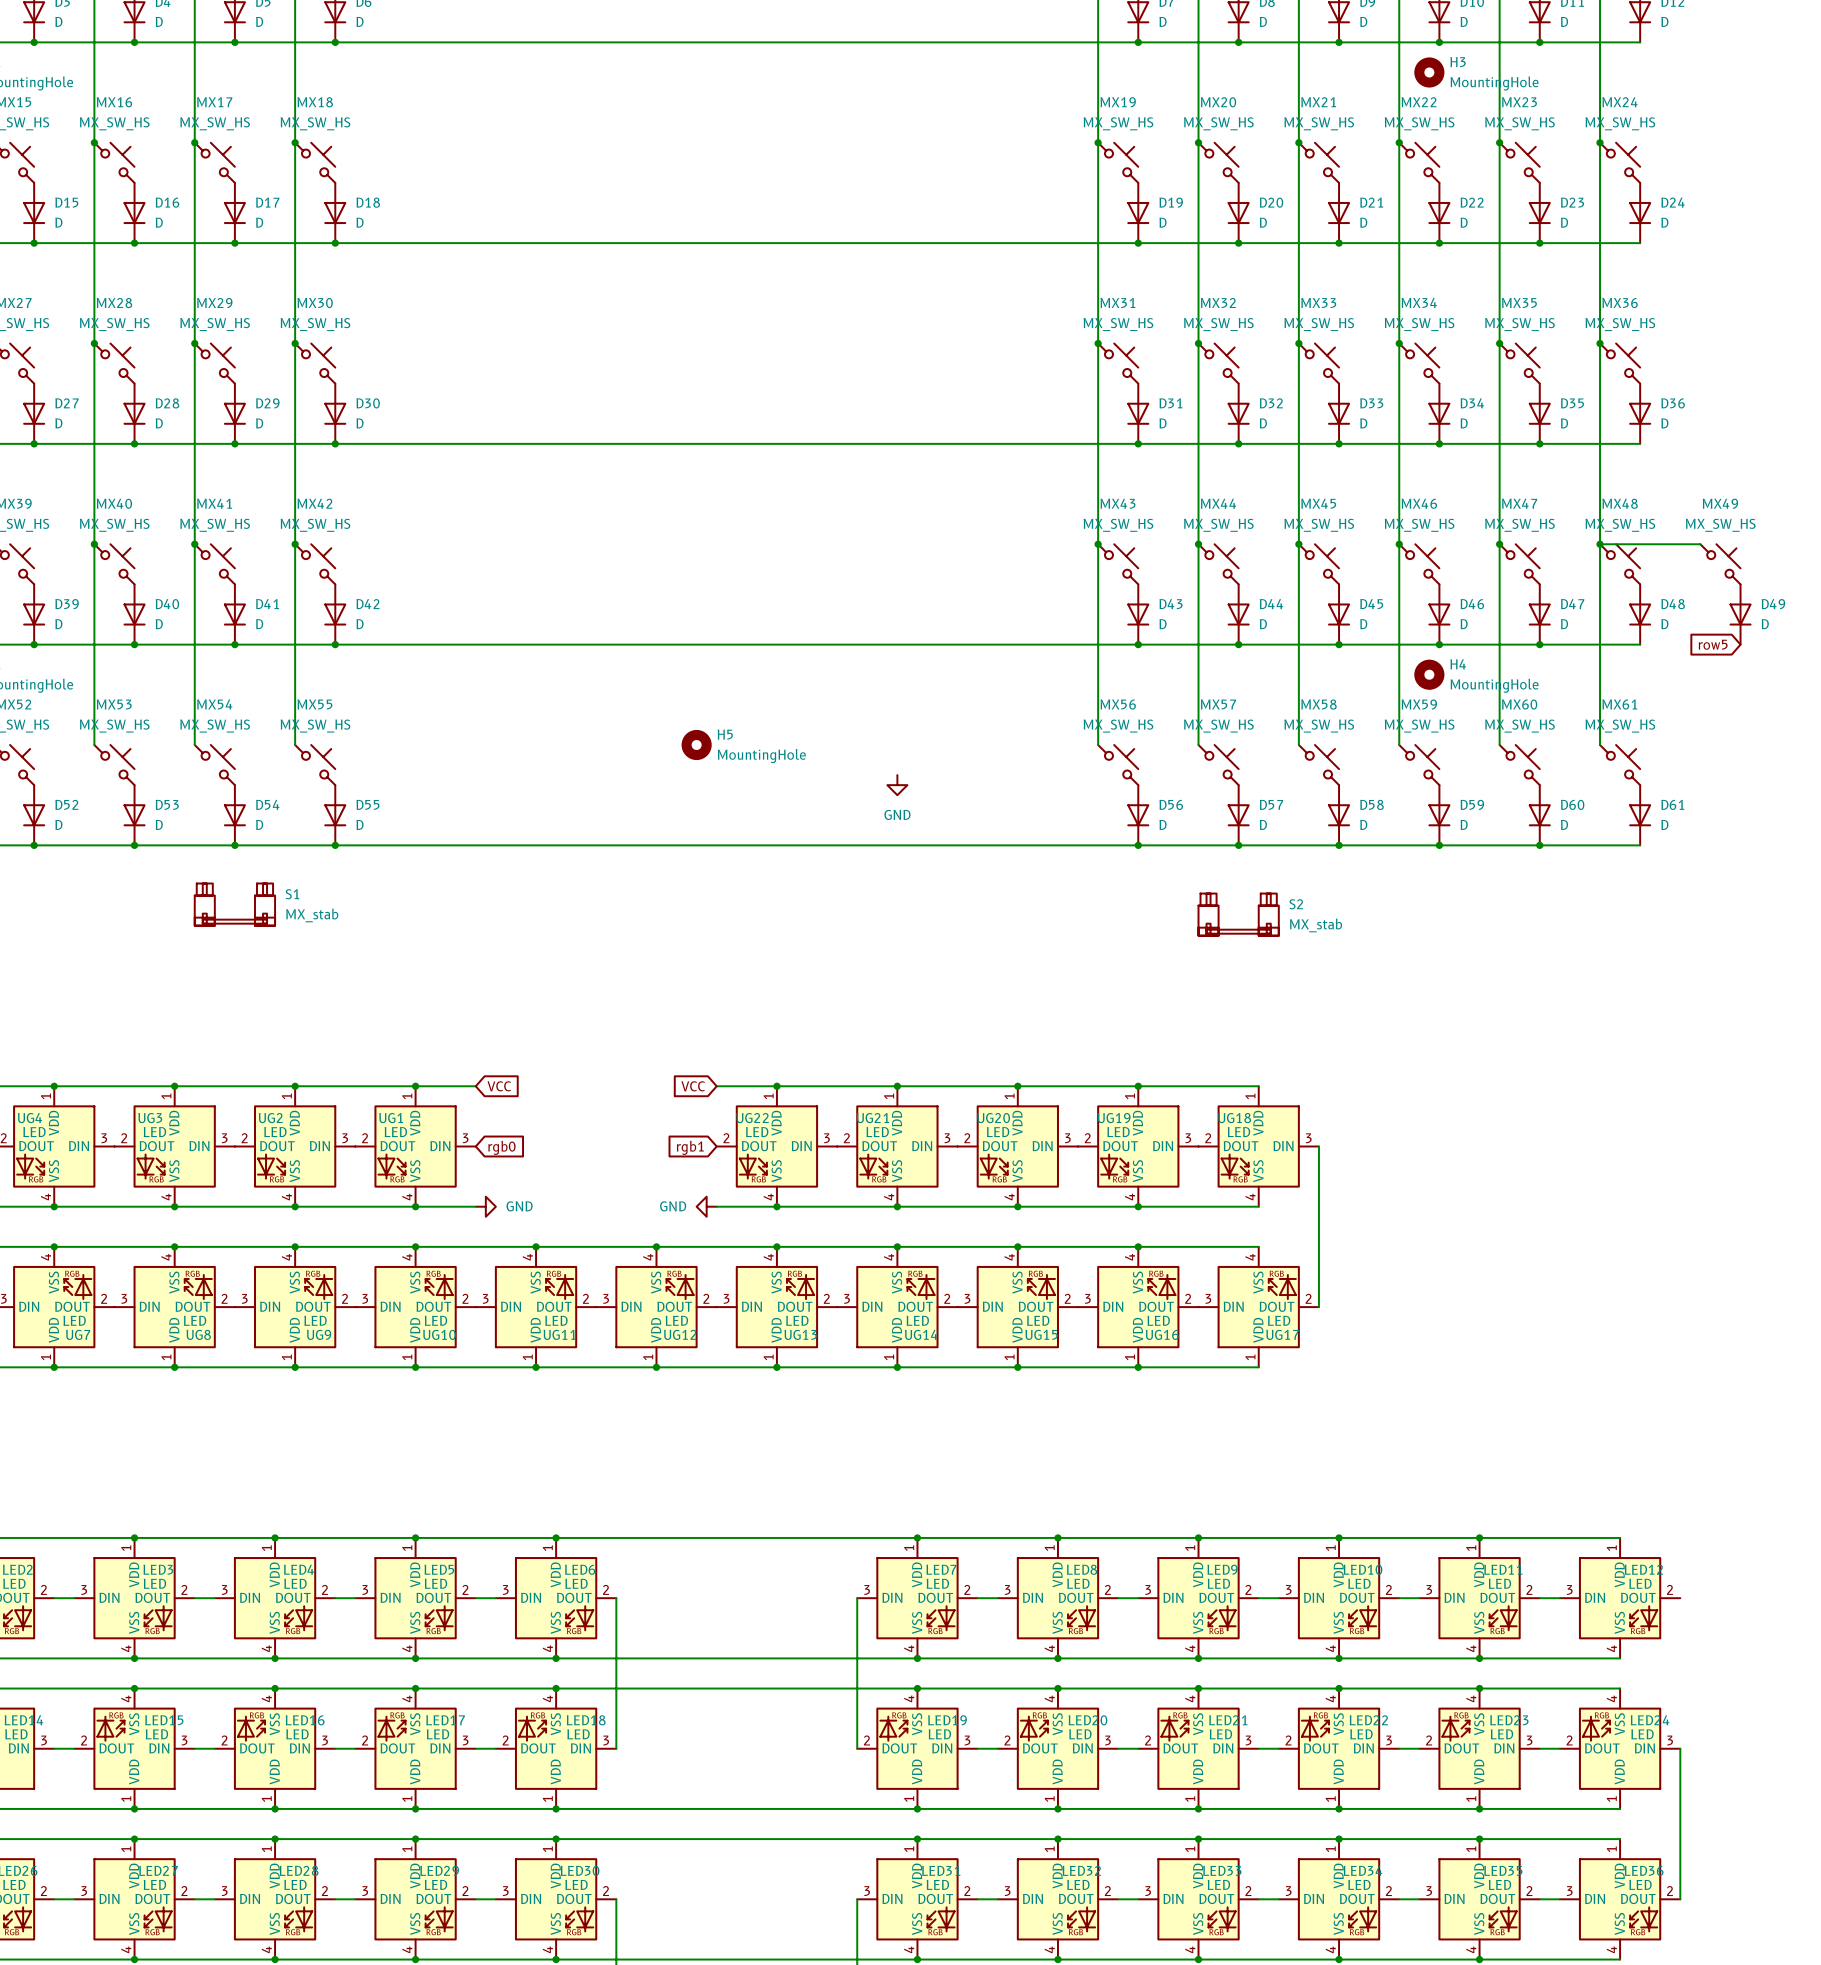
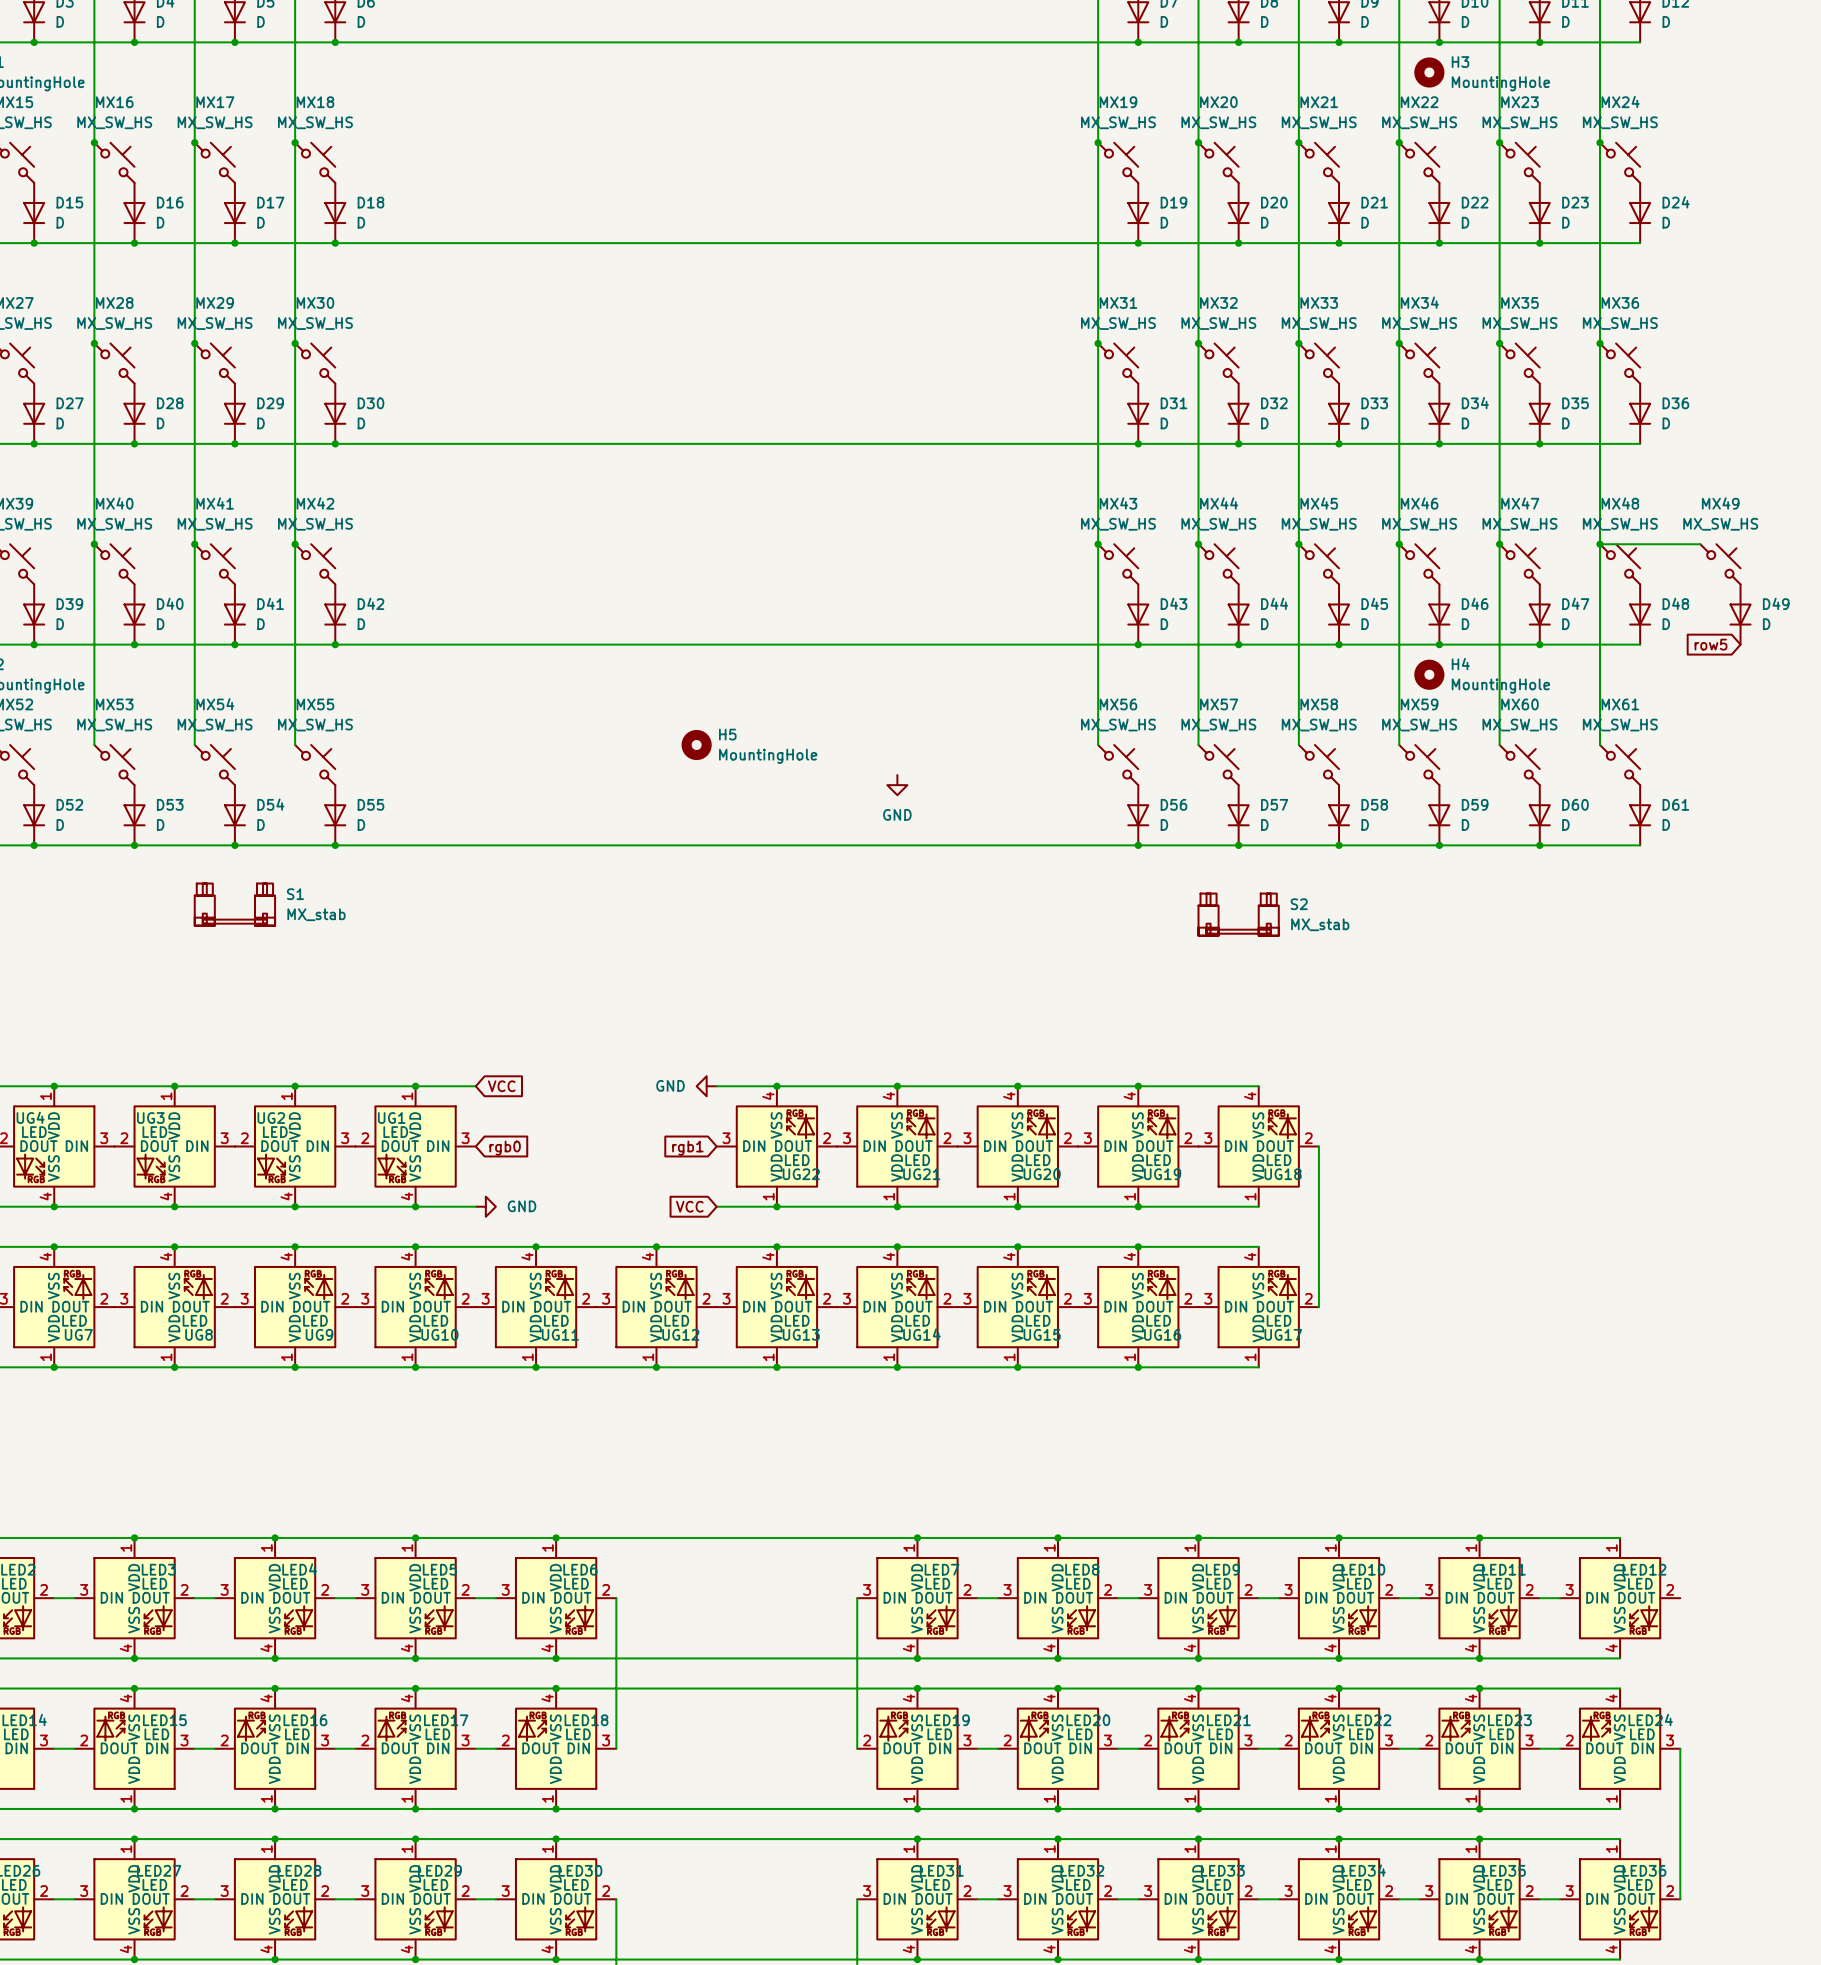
global label position: VCC (693, 1086) -> VCC (689, 1206)
UG22 rotation: 0° (776, 1146) -> 180° (776, 1146)
UG21 rotation: 0° (897, 1146) -> 180° (897, 1146)
UG20 rotation: 0° (1017, 1146) -> 180° (1017, 1146)
UG19 rotation: 0° (1138, 1146) -> 180° (1138, 1146)
UG18 rotation: 0° (1258, 1146) -> 180° (1258, 1146)
power symbol position: GND (706, 1206) -> GND (706, 1086)

